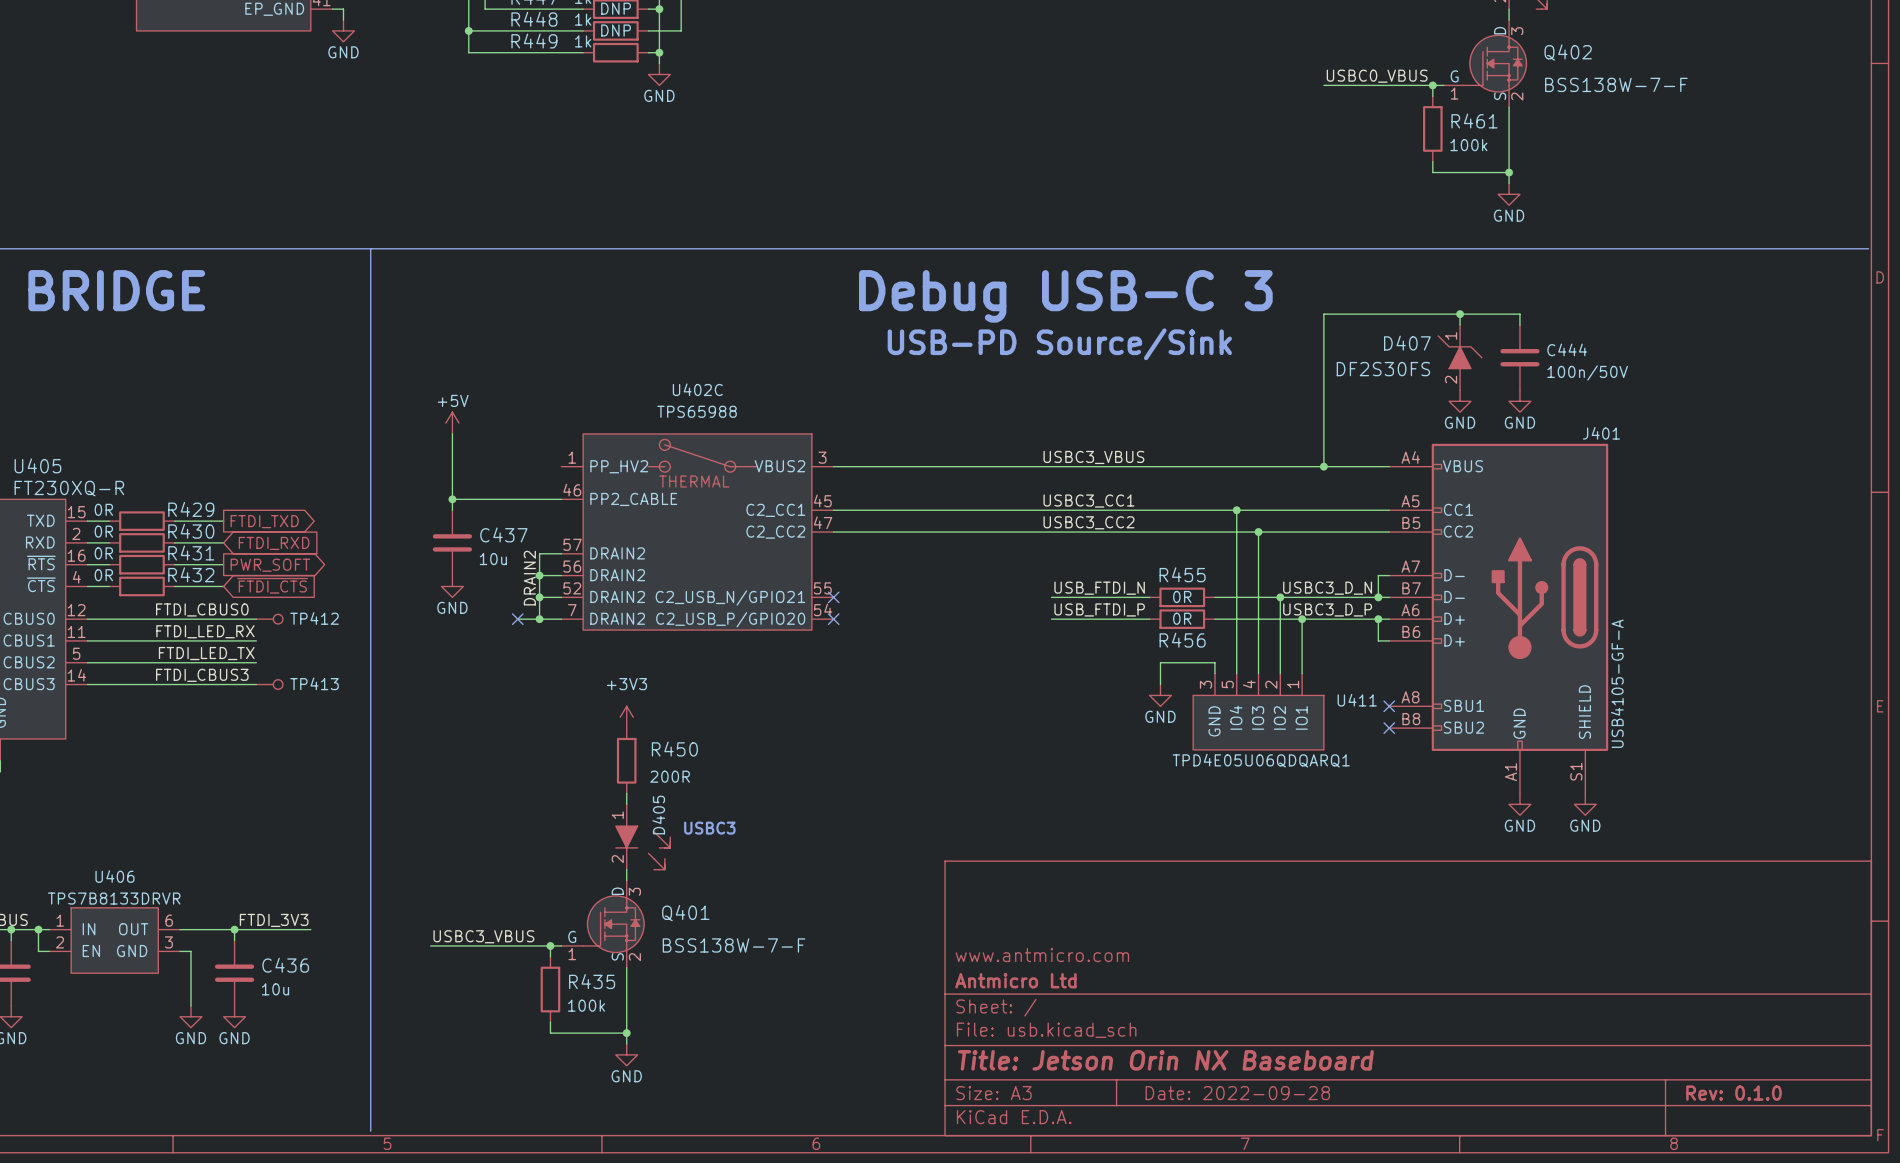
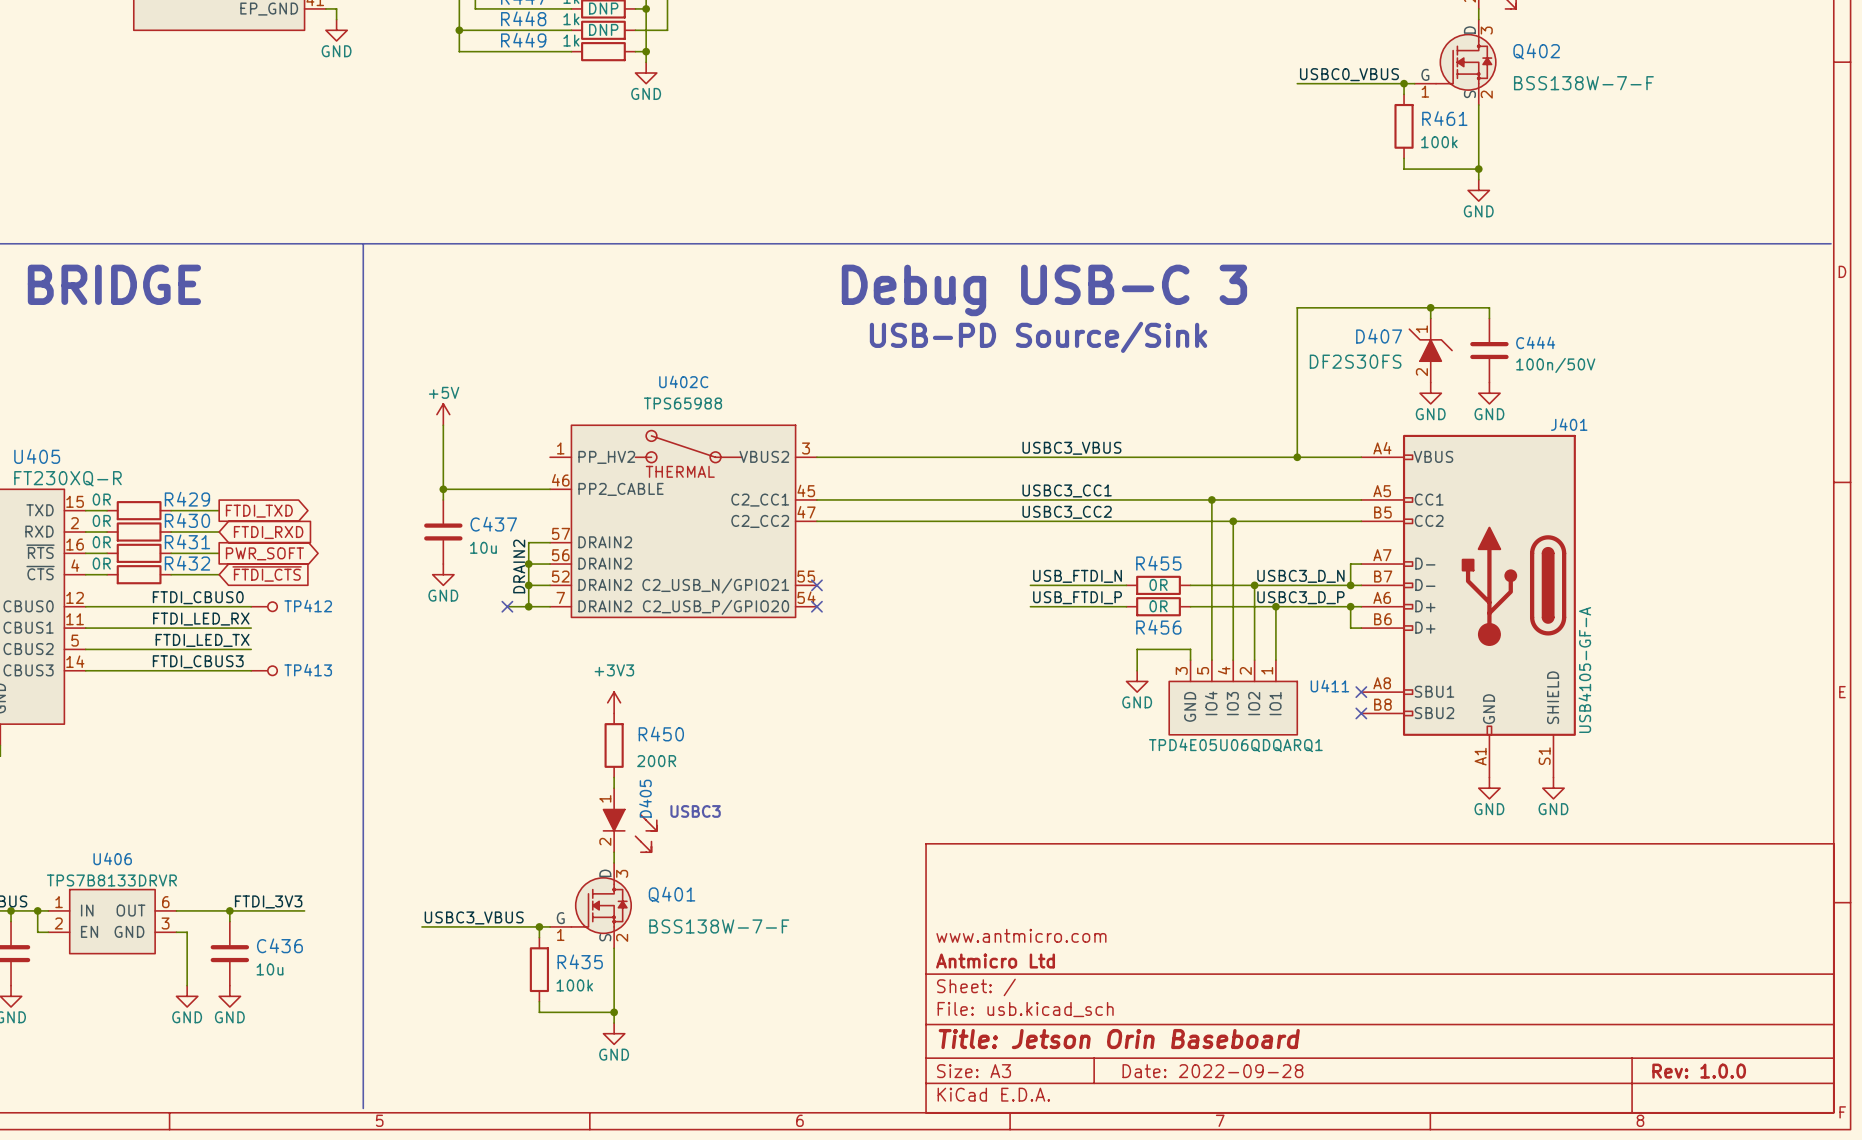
title block: Title: Jetson Orin NX Baseboard (1165, 1060) -> Title: Jetson Orin Baseboard (1119, 1039)
title block: Rev: 0.1.0 (1734, 1093) -> Rev: 1.0.0 (1699, 1071)

